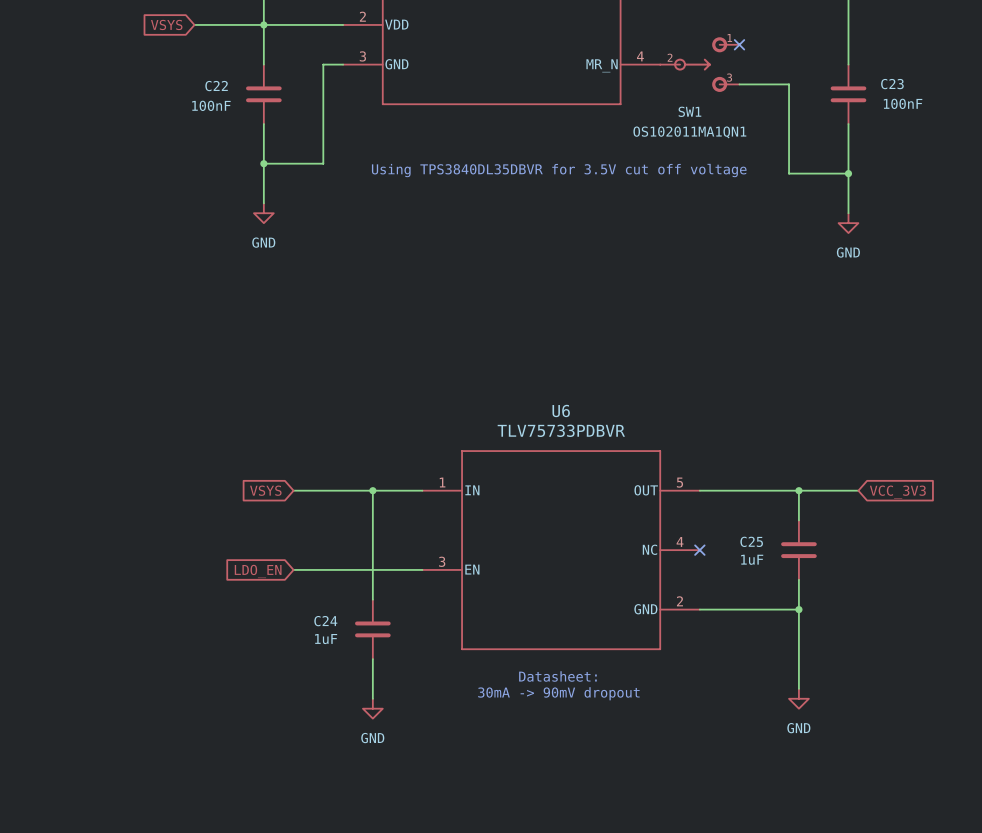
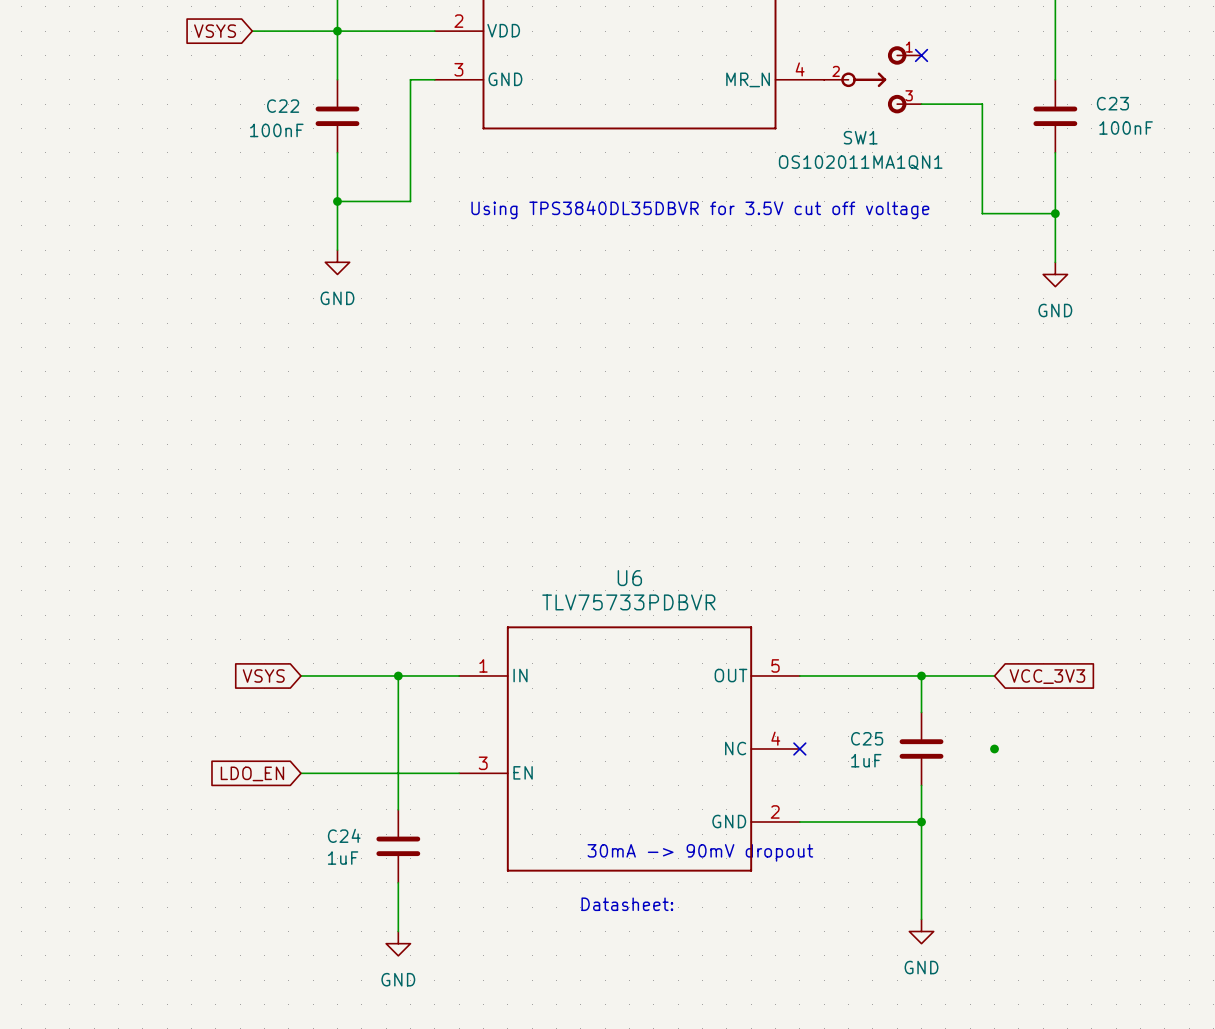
global label position: VSYS (265, 490) -> VSYS (263, 675)
wire: (293, 490) (422, 490) -> (300, 675) (459, 675)
wire: (372, 490) (372, 599) -> (398, 675) (398, 809)
junction: (372, 490) -> none
wire: (699, 490) (858, 490) -> (799, 675) (994, 675)
wire: (798, 490) (798, 520) -> (921, 675) (921, 712)
junction: (798, 490) -> none
global label position: VCC_3V3 (897, 492) -> VCC_3V3 (1047, 676)
junction: none -> (398, 675)
U6 position: (561, 550) -> (629, 748)
no-connect mark: (699, 550) -> none
junction: none -> (921, 675)
C25 position: (798, 550) -> (921, 748)
wire: (293, 569) (422, 569) -> (300, 773) (459, 773)
global label position: LDO_EN (258, 571) -> LDO_EN (252, 773)
wire: (798, 579) (798, 688) -> (921, 785) (921, 919)
no-connect mark: none -> (799, 748)
wire: (699, 609) (798, 609) -> (799, 822) (921, 822)
C24 position: (372, 629) -> (398, 846)
wire: (372, 659) (372, 698) -> (398, 882) (398, 931)
junction: none -> (921, 822)
text position: Datasheet: (557, 676) -> Datasheet: (627, 904)
power symbol position: GND (798, 698) -> GND (921, 931)
power symbol position: GND (372, 708) -> GND (398, 943)

